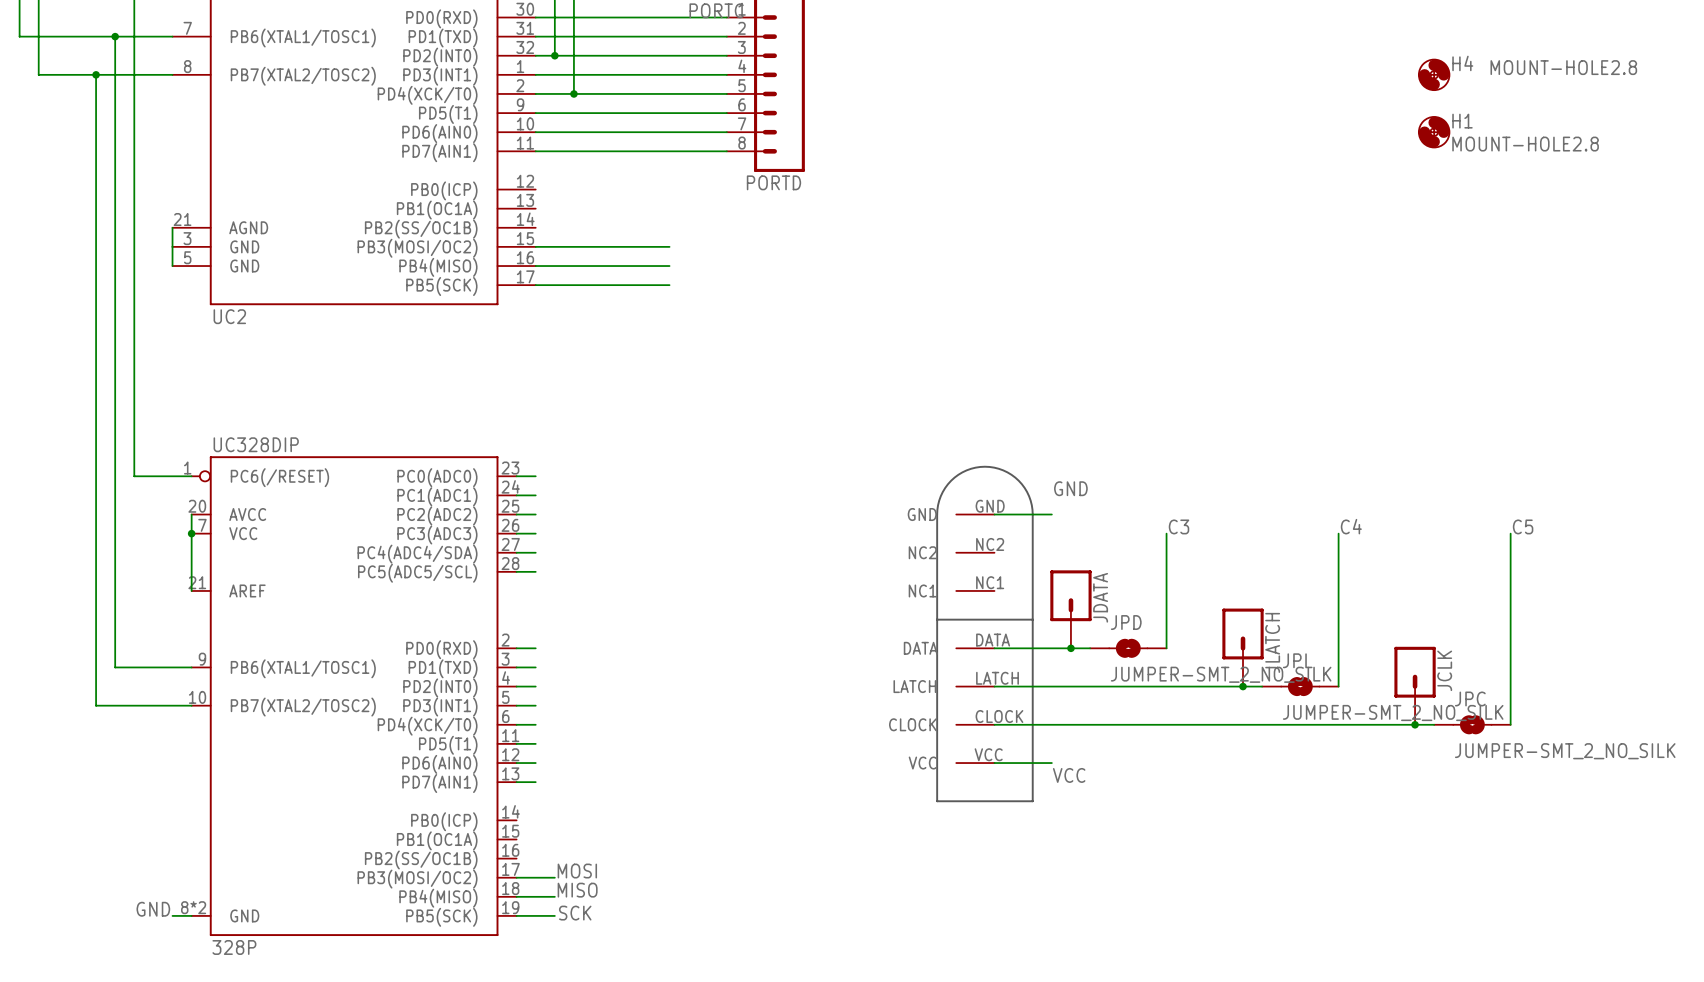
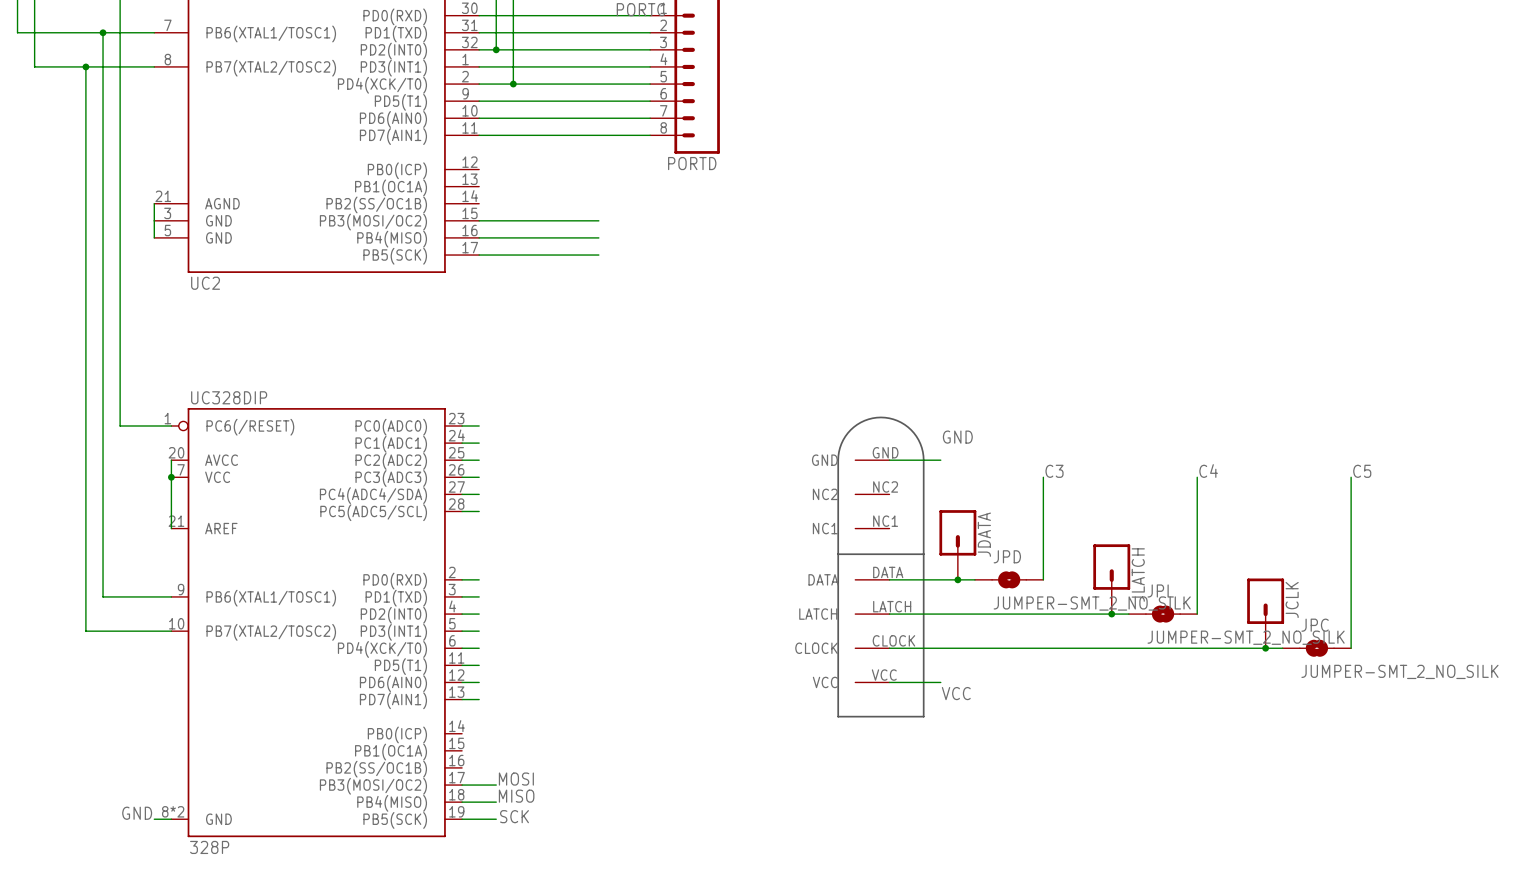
H4: MOUNT-HOLE2.8 (1434, 74) -> none
H1: MOUNT-HOLE2.8 (1434, 132) -> none

